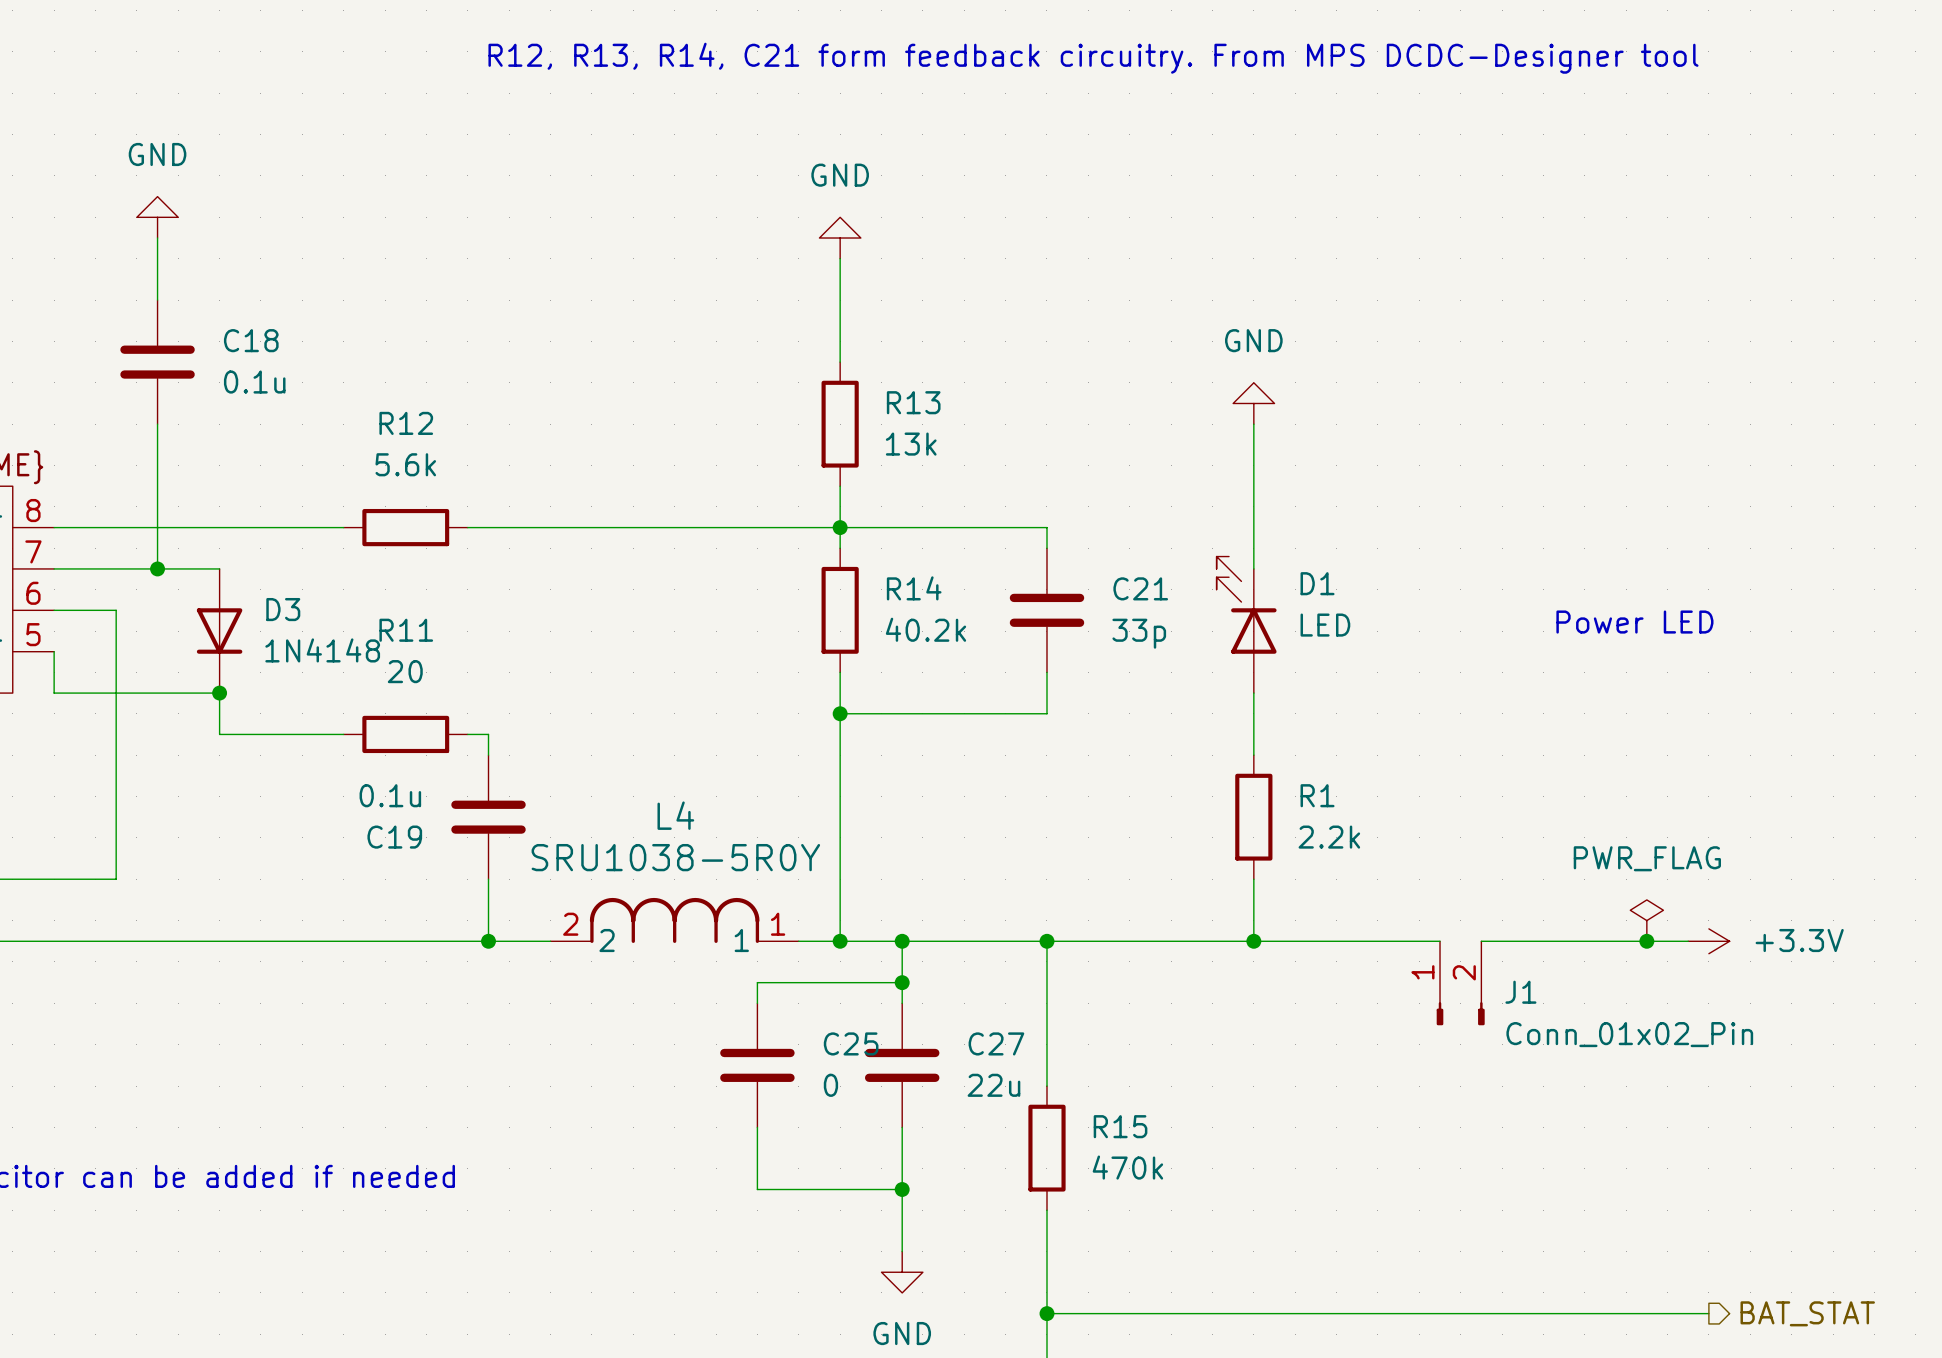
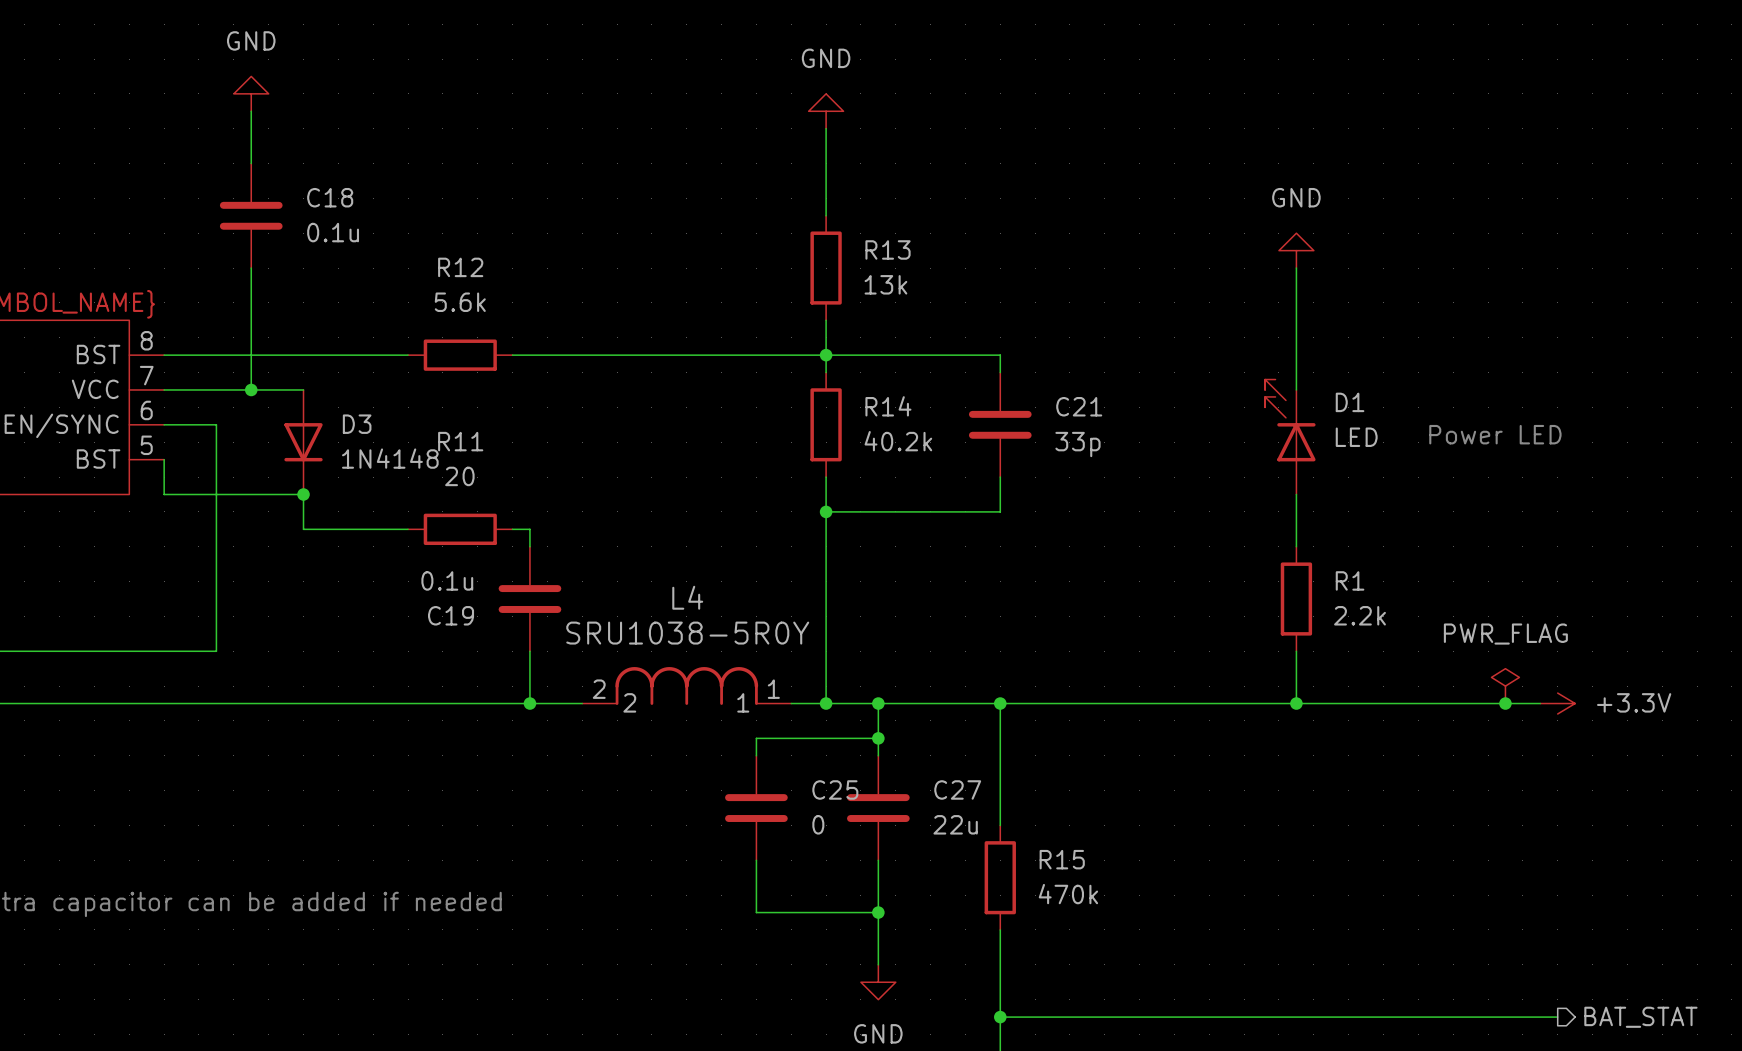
power symbol position: GND (1253, 403) -> GND (1296, 250)
wire: (1253, 424) (1253, 568) -> (1296, 268) (1296, 389)
D1 position: (1246, 624) -> (1290, 437)
wire: (1253, 693) (1253, 755) -> (1296, 494) (1296, 546)
R1 position: (1253, 817) -> (1296, 599)
wire: (1253, 879) (1253, 941) -> (1296, 651) (1296, 703)
junction: (1253, 941) -> none
junction: none -> (1296, 703)
wire: none -> (1331, 703) (1366, 703)
J1: Conn_01x02_Pin (1460, 983) -> none

